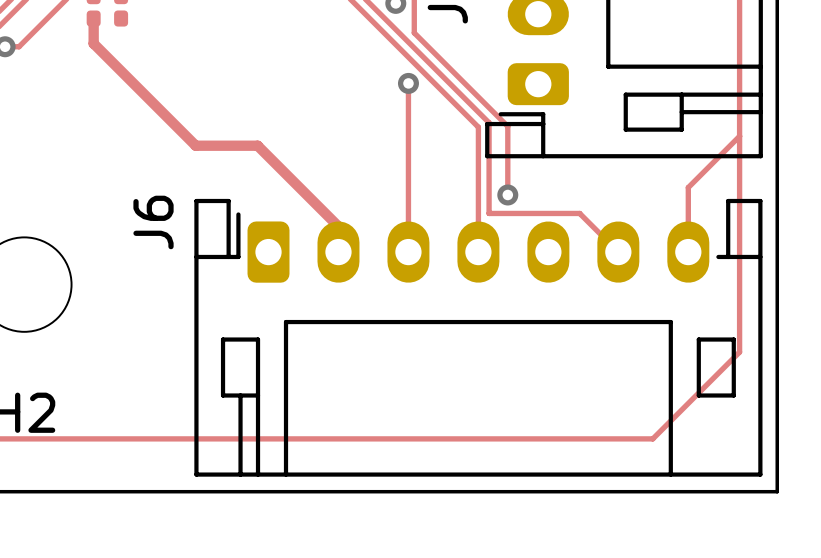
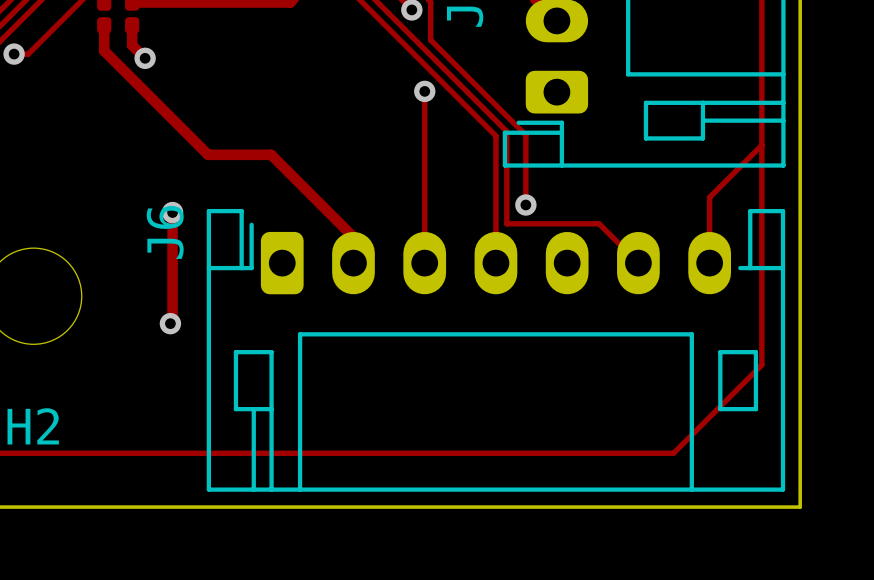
track: none -> (132, 25) (132, 45) (145, 58)
via: none -> (145, 58)
track: none -> (172, 212) (172, 321) (170, 323)
via: none -> (172, 212)
via: none -> (170, 323)

